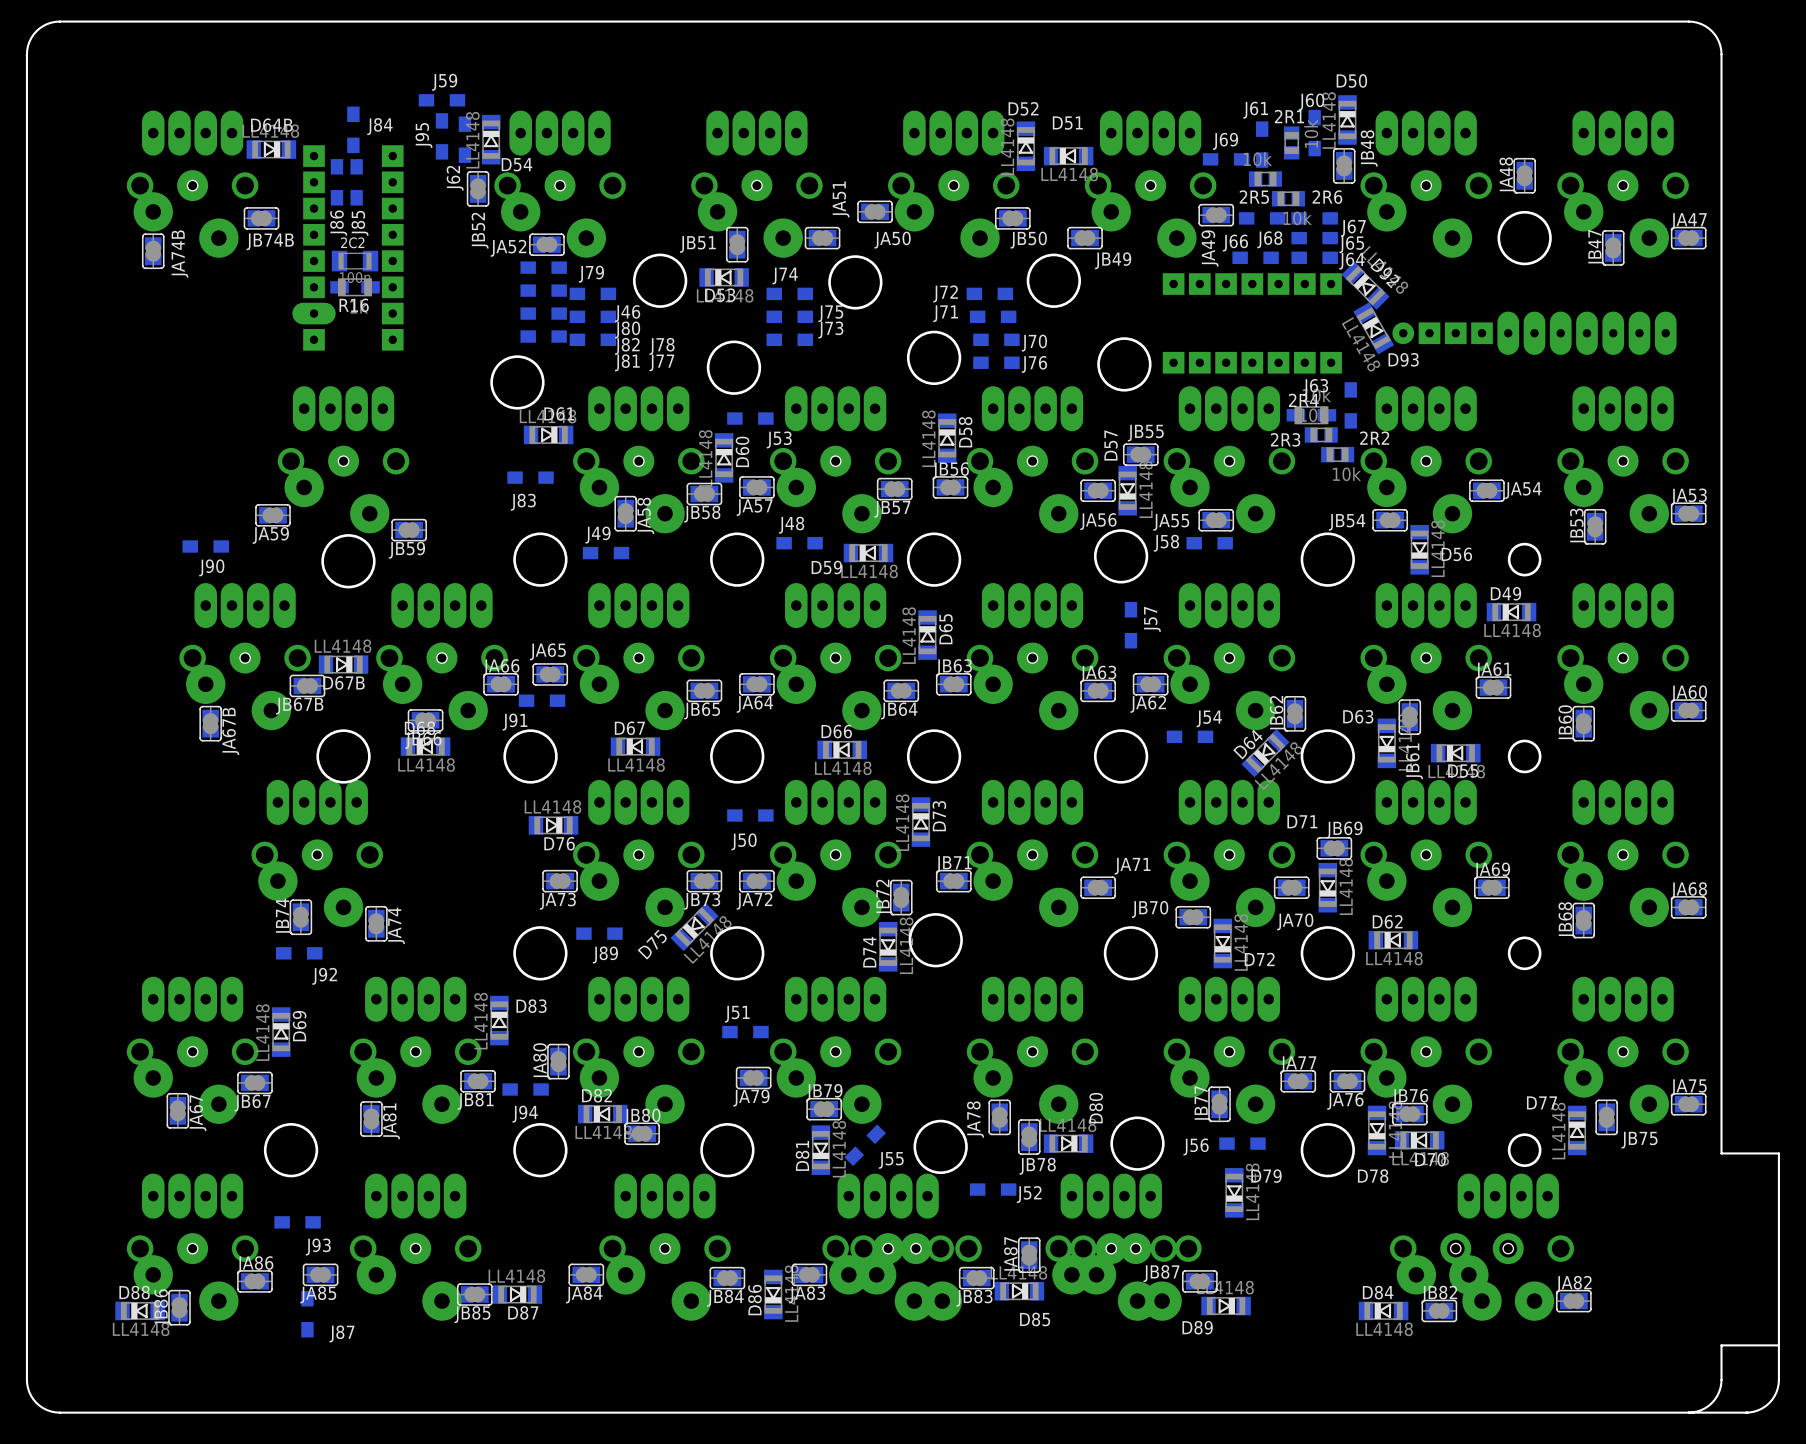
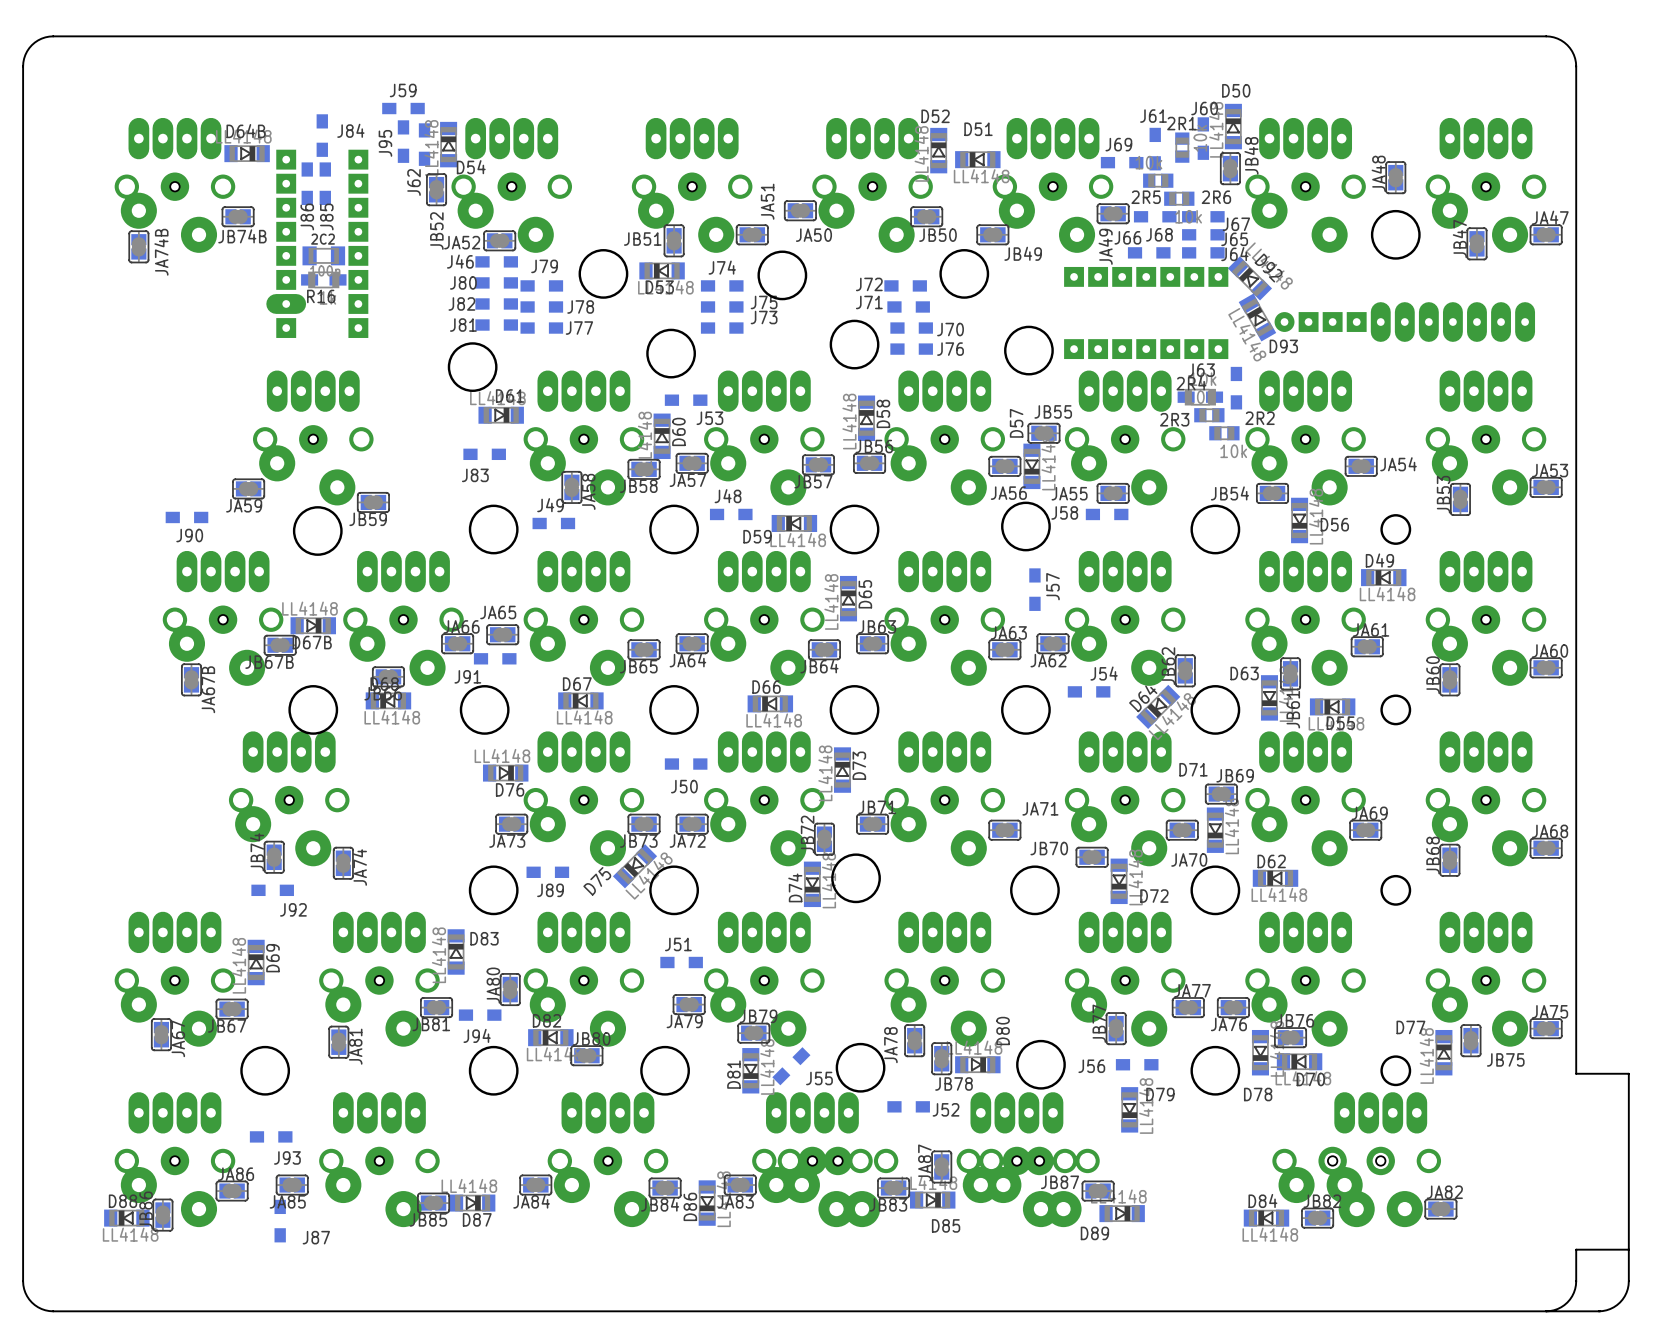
J46 name position: J46 (627, 313) -> J46 (460, 261)
J80 name position: J80 (627, 330) -> J80 (463, 282)
J82 name position: J82 (627, 346) -> J82 (461, 303)
J78 name position: J78 (662, 346) -> J78 (580, 306)
J81 name position: J81 (627, 362) -> J81 (463, 325)
J77 name position: J77 (661, 362) -> J77 (579, 328)

